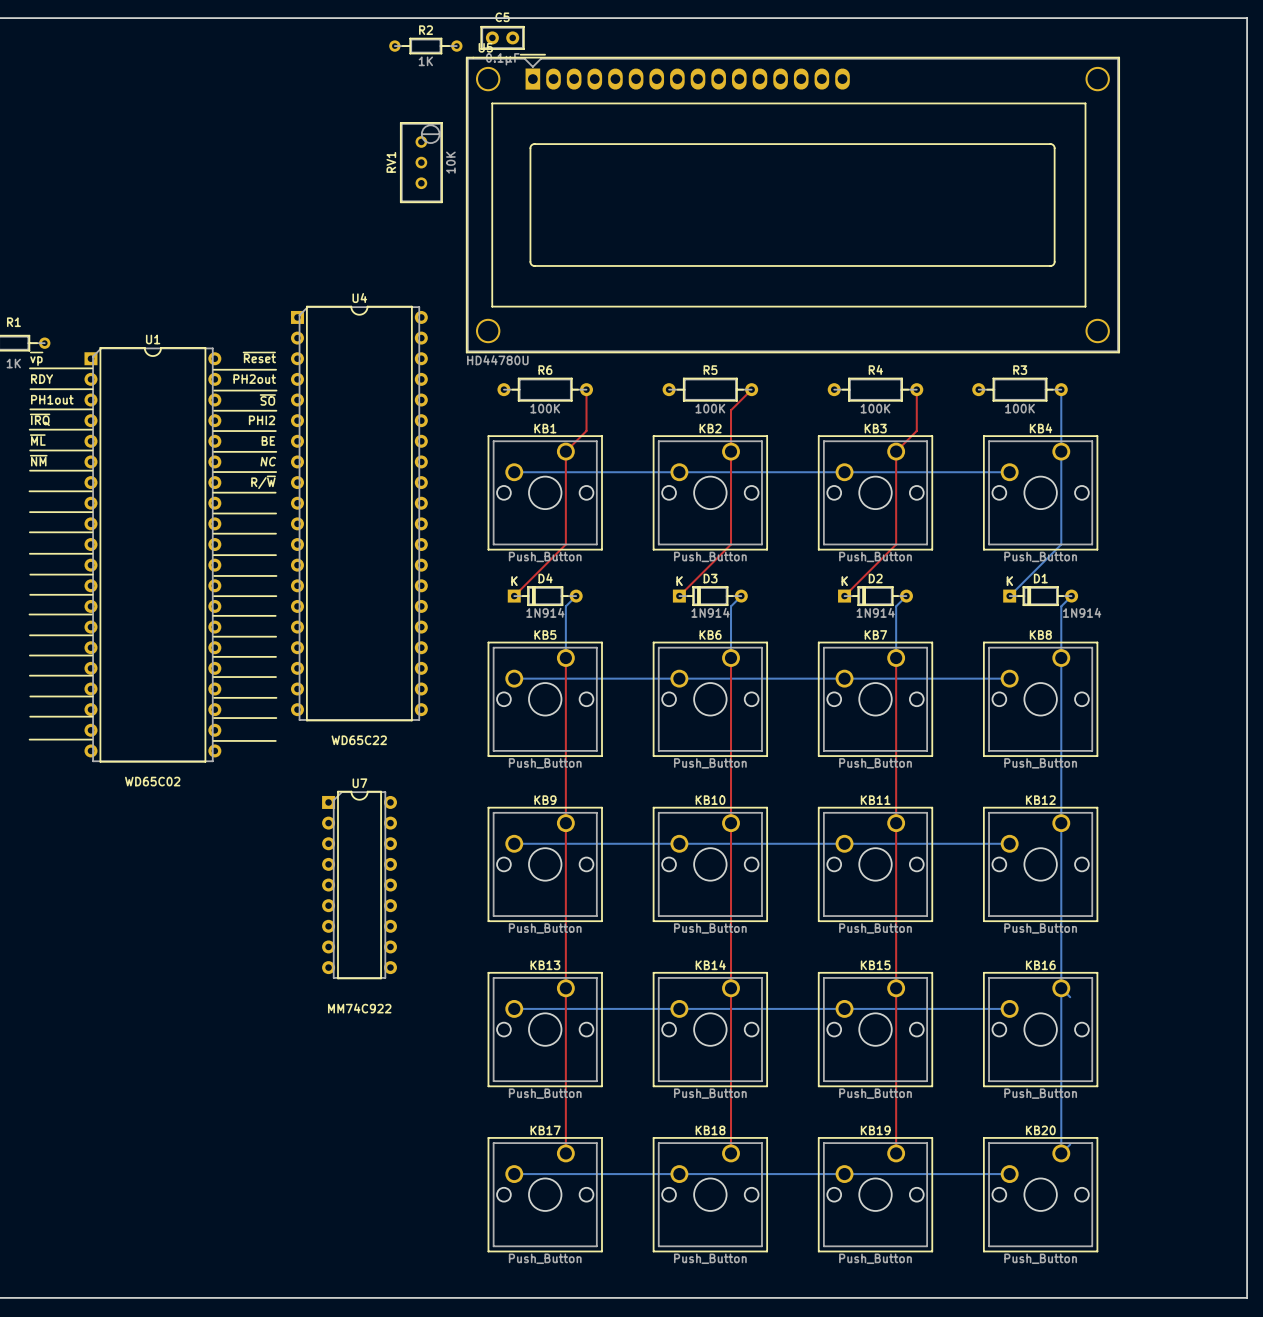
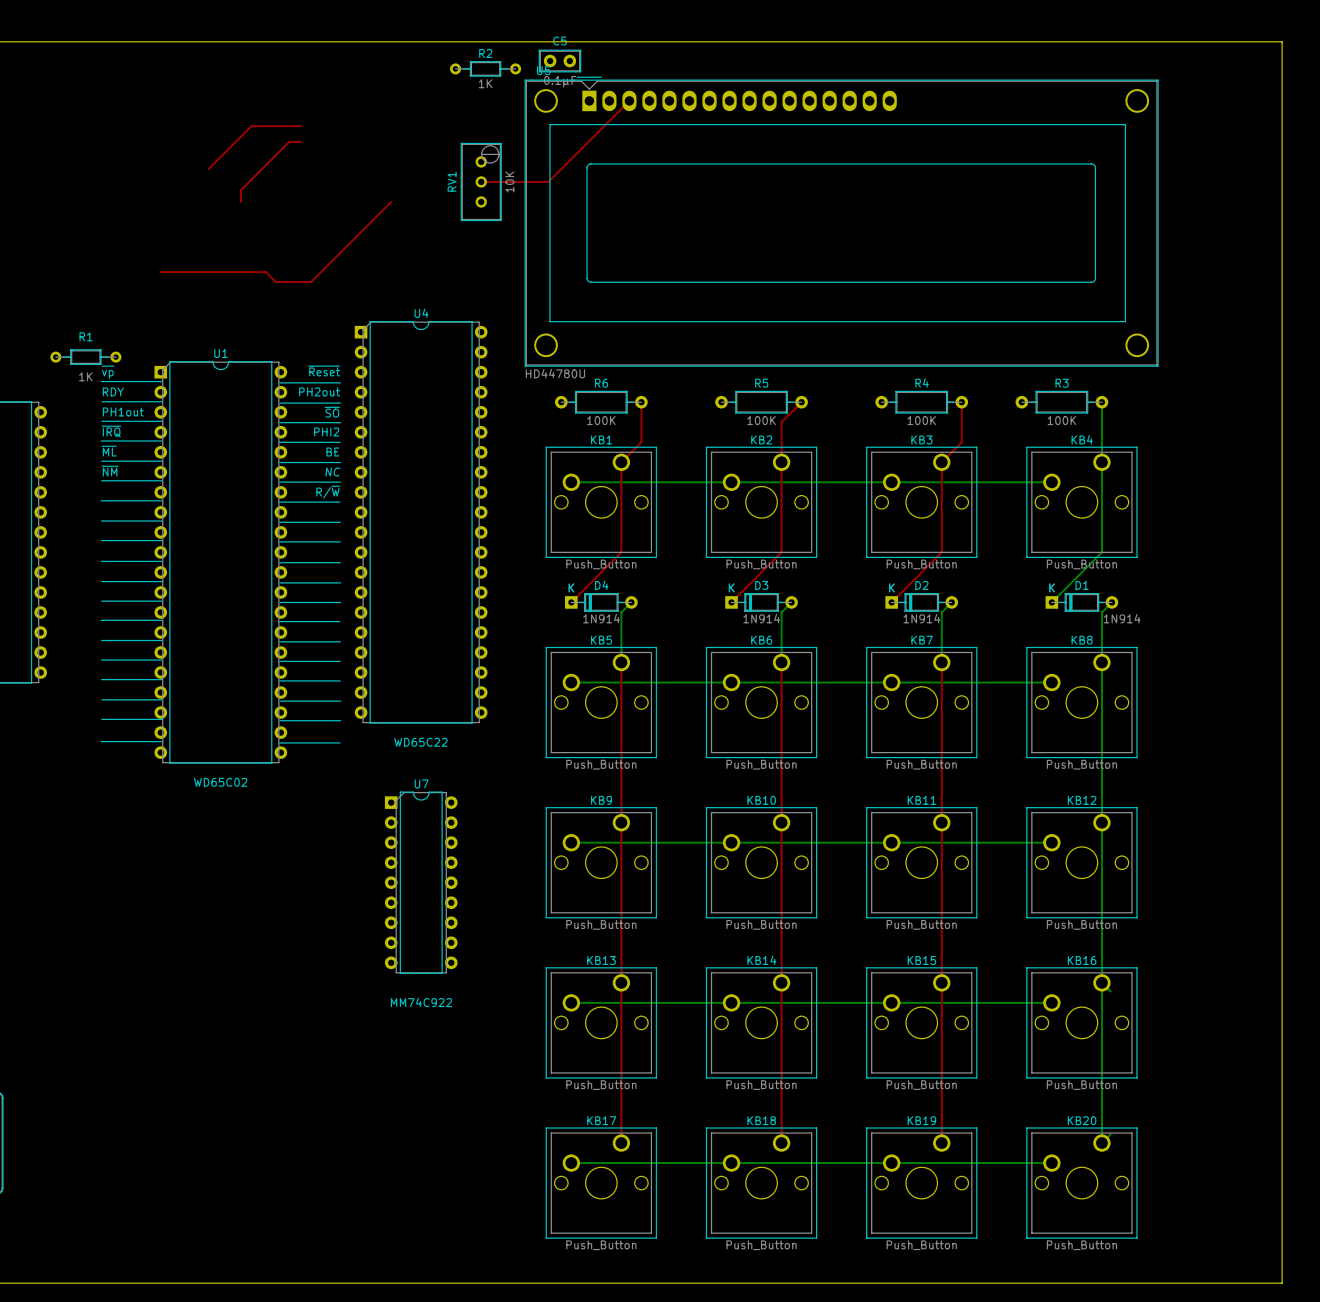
top track: none -> (629, 100) (548, 181) (481, 181)
top track: none -> (301, 126) (251, 126) (208, 169)
top track: none -> (301, 141) (289, 141) (240, 190) (240, 201)
top track: none -> (391, 201) (311, 282) (275, 282) (265, 272) (160, 272)

